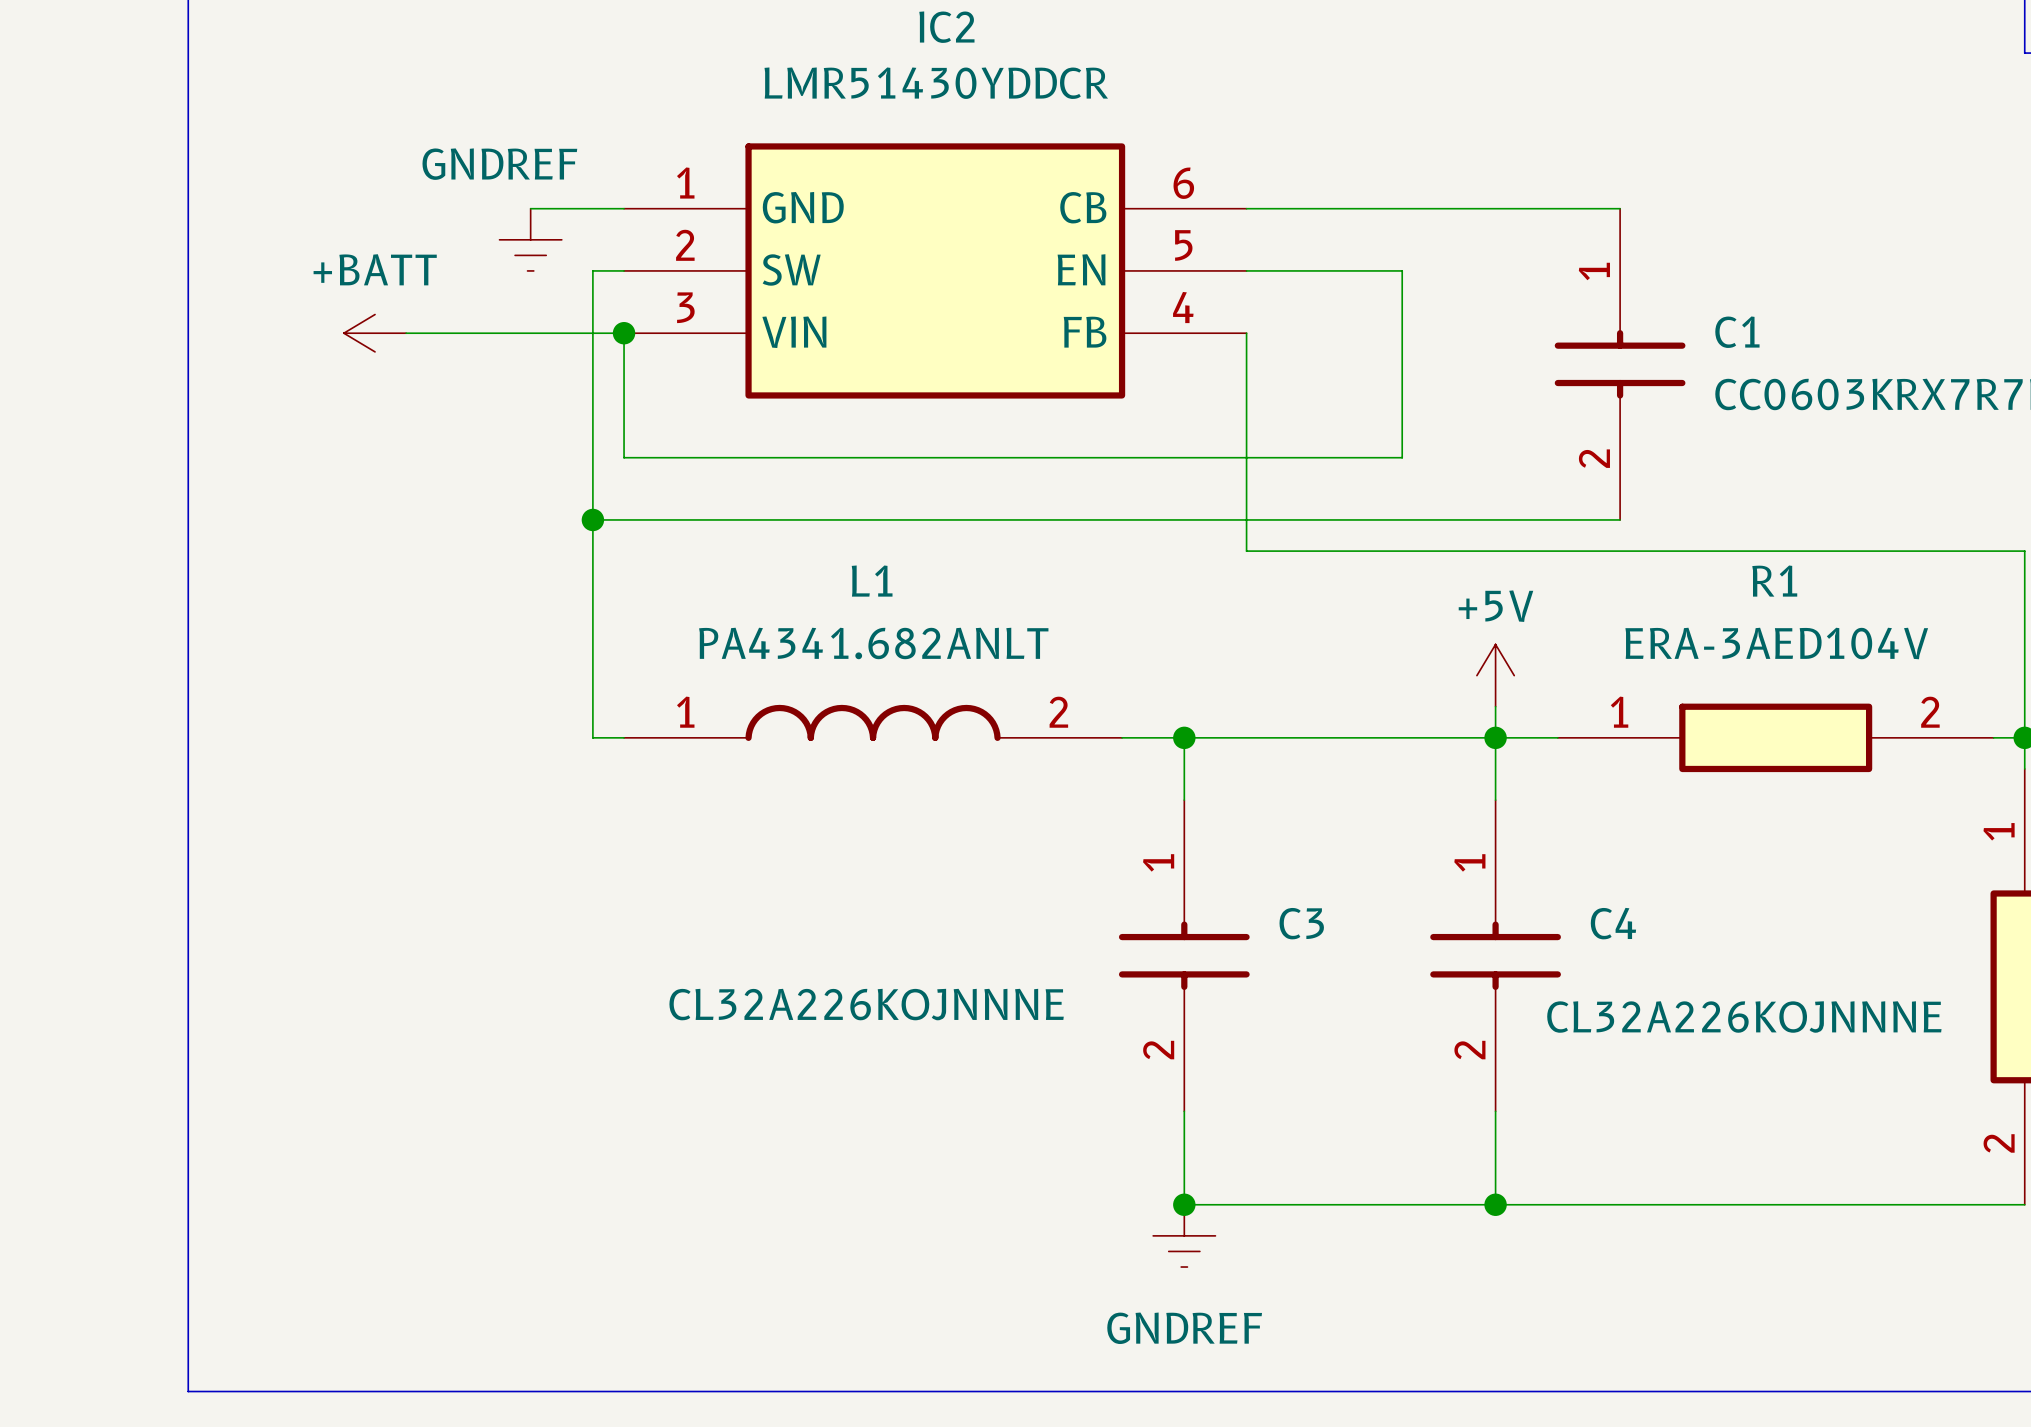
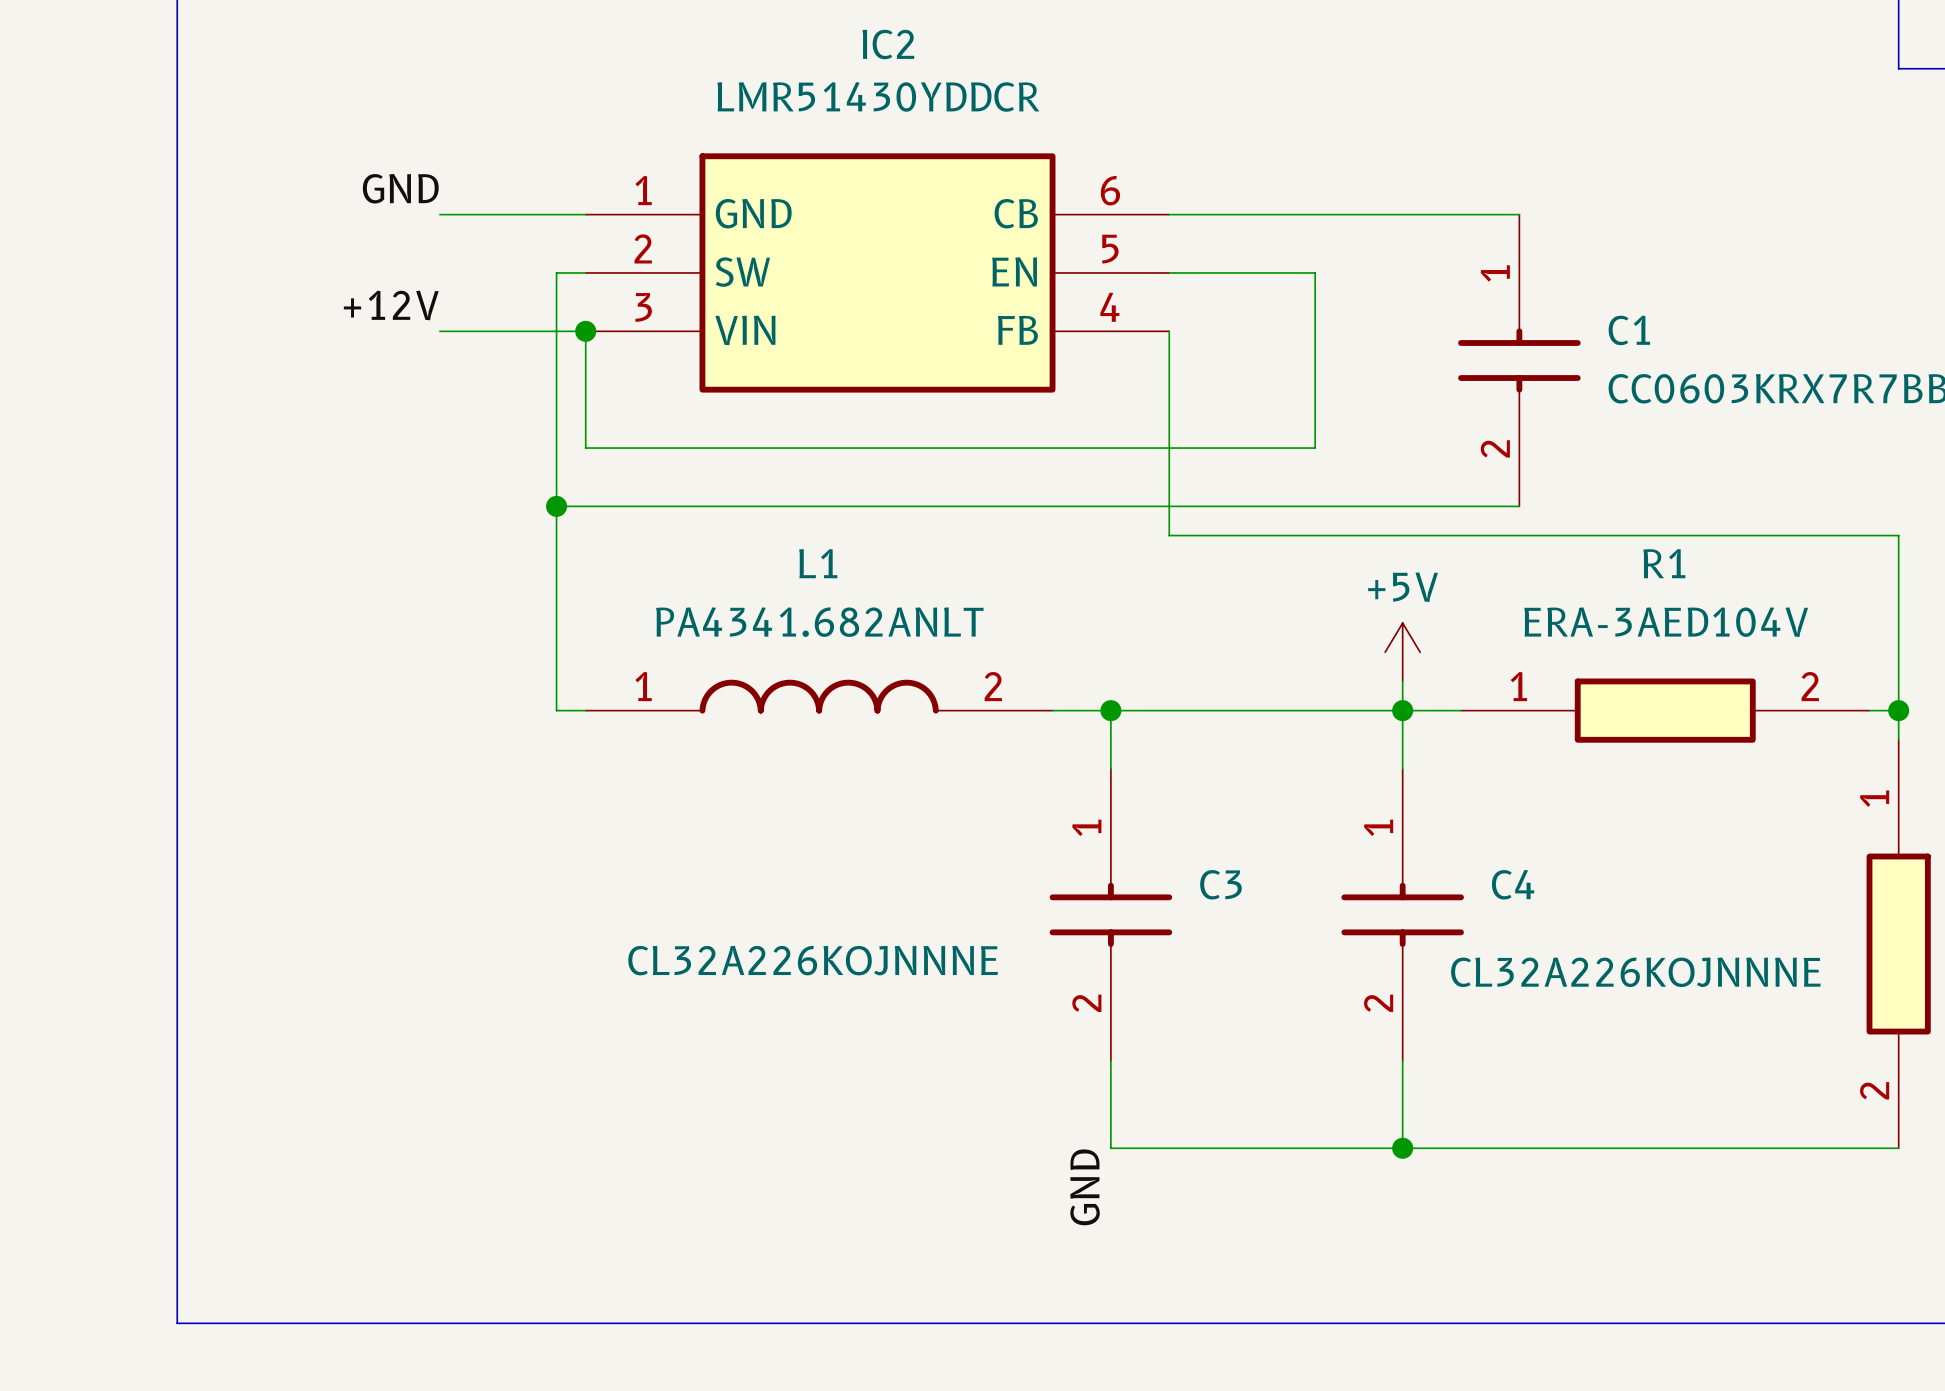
label: none -> GND (400, 188)
power symbol: GNDREF (530, 239) -> none
label: none -> +12V (391, 305)
power symbol: +BATT (375, 333) -> none
wire: (406, 333) (468, 333) -> (439, 214) (498, 214)
junction: (1184, 1204) -> none
power symbol: GNDREF (1184, 1235) -> none
label: none -> GND (1085, 1187)

